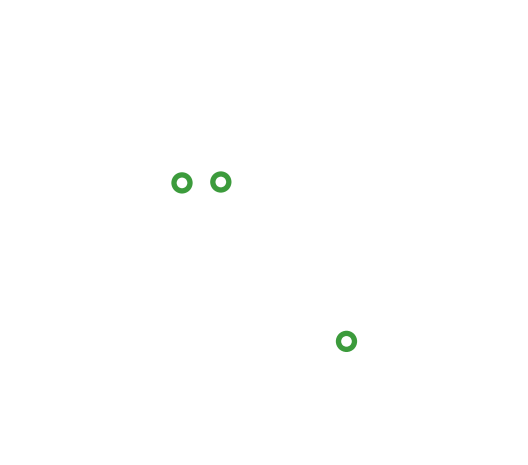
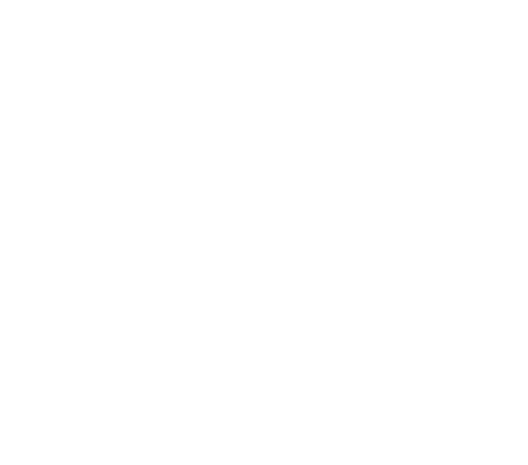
via: (220, 181) -> none
via: (181, 182) -> none
via: (346, 341) -> none

